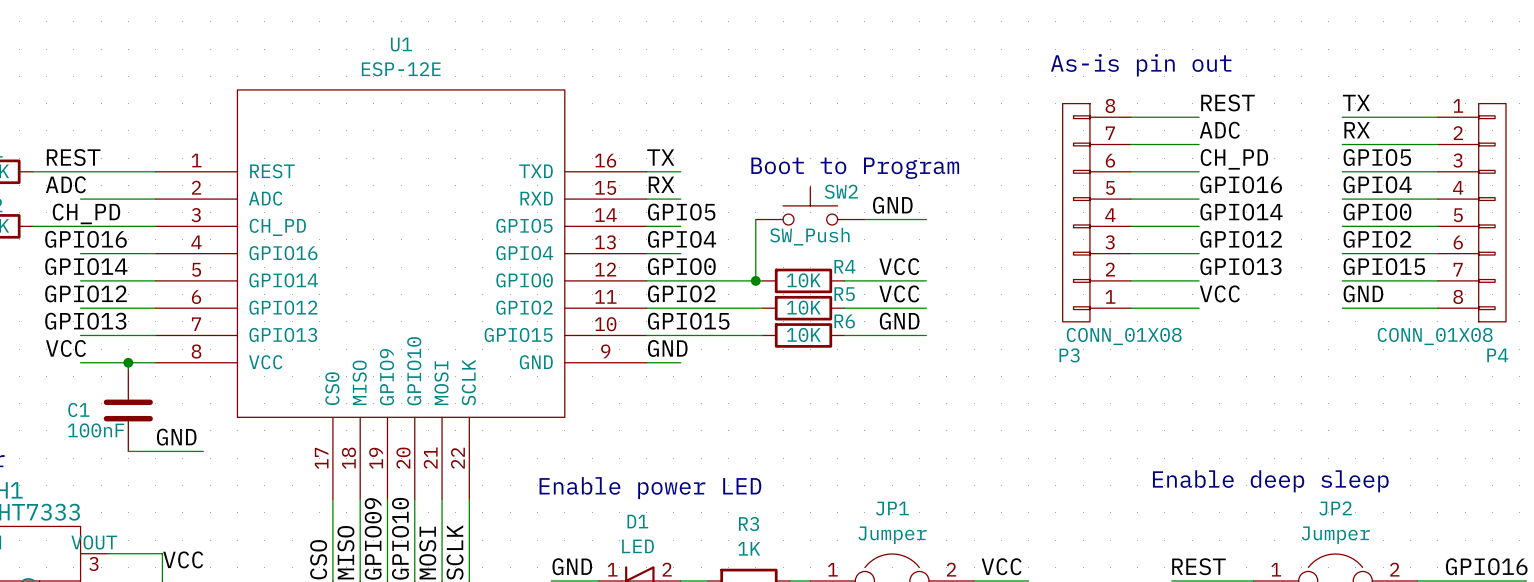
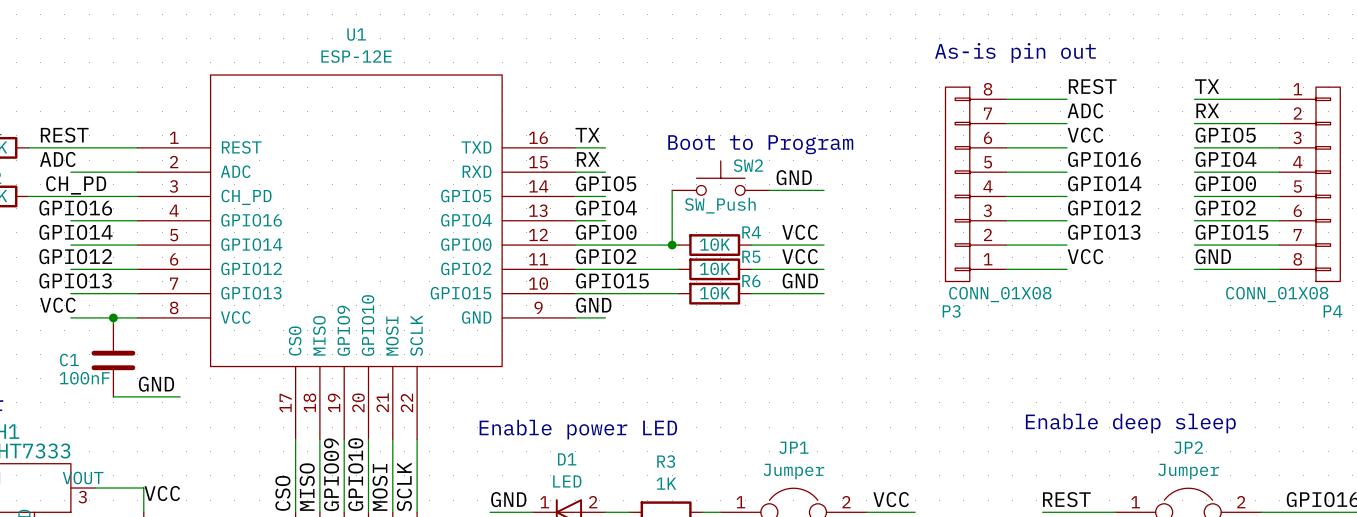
label: CH_PD (1234, 159) -> VCC (1085, 135)

